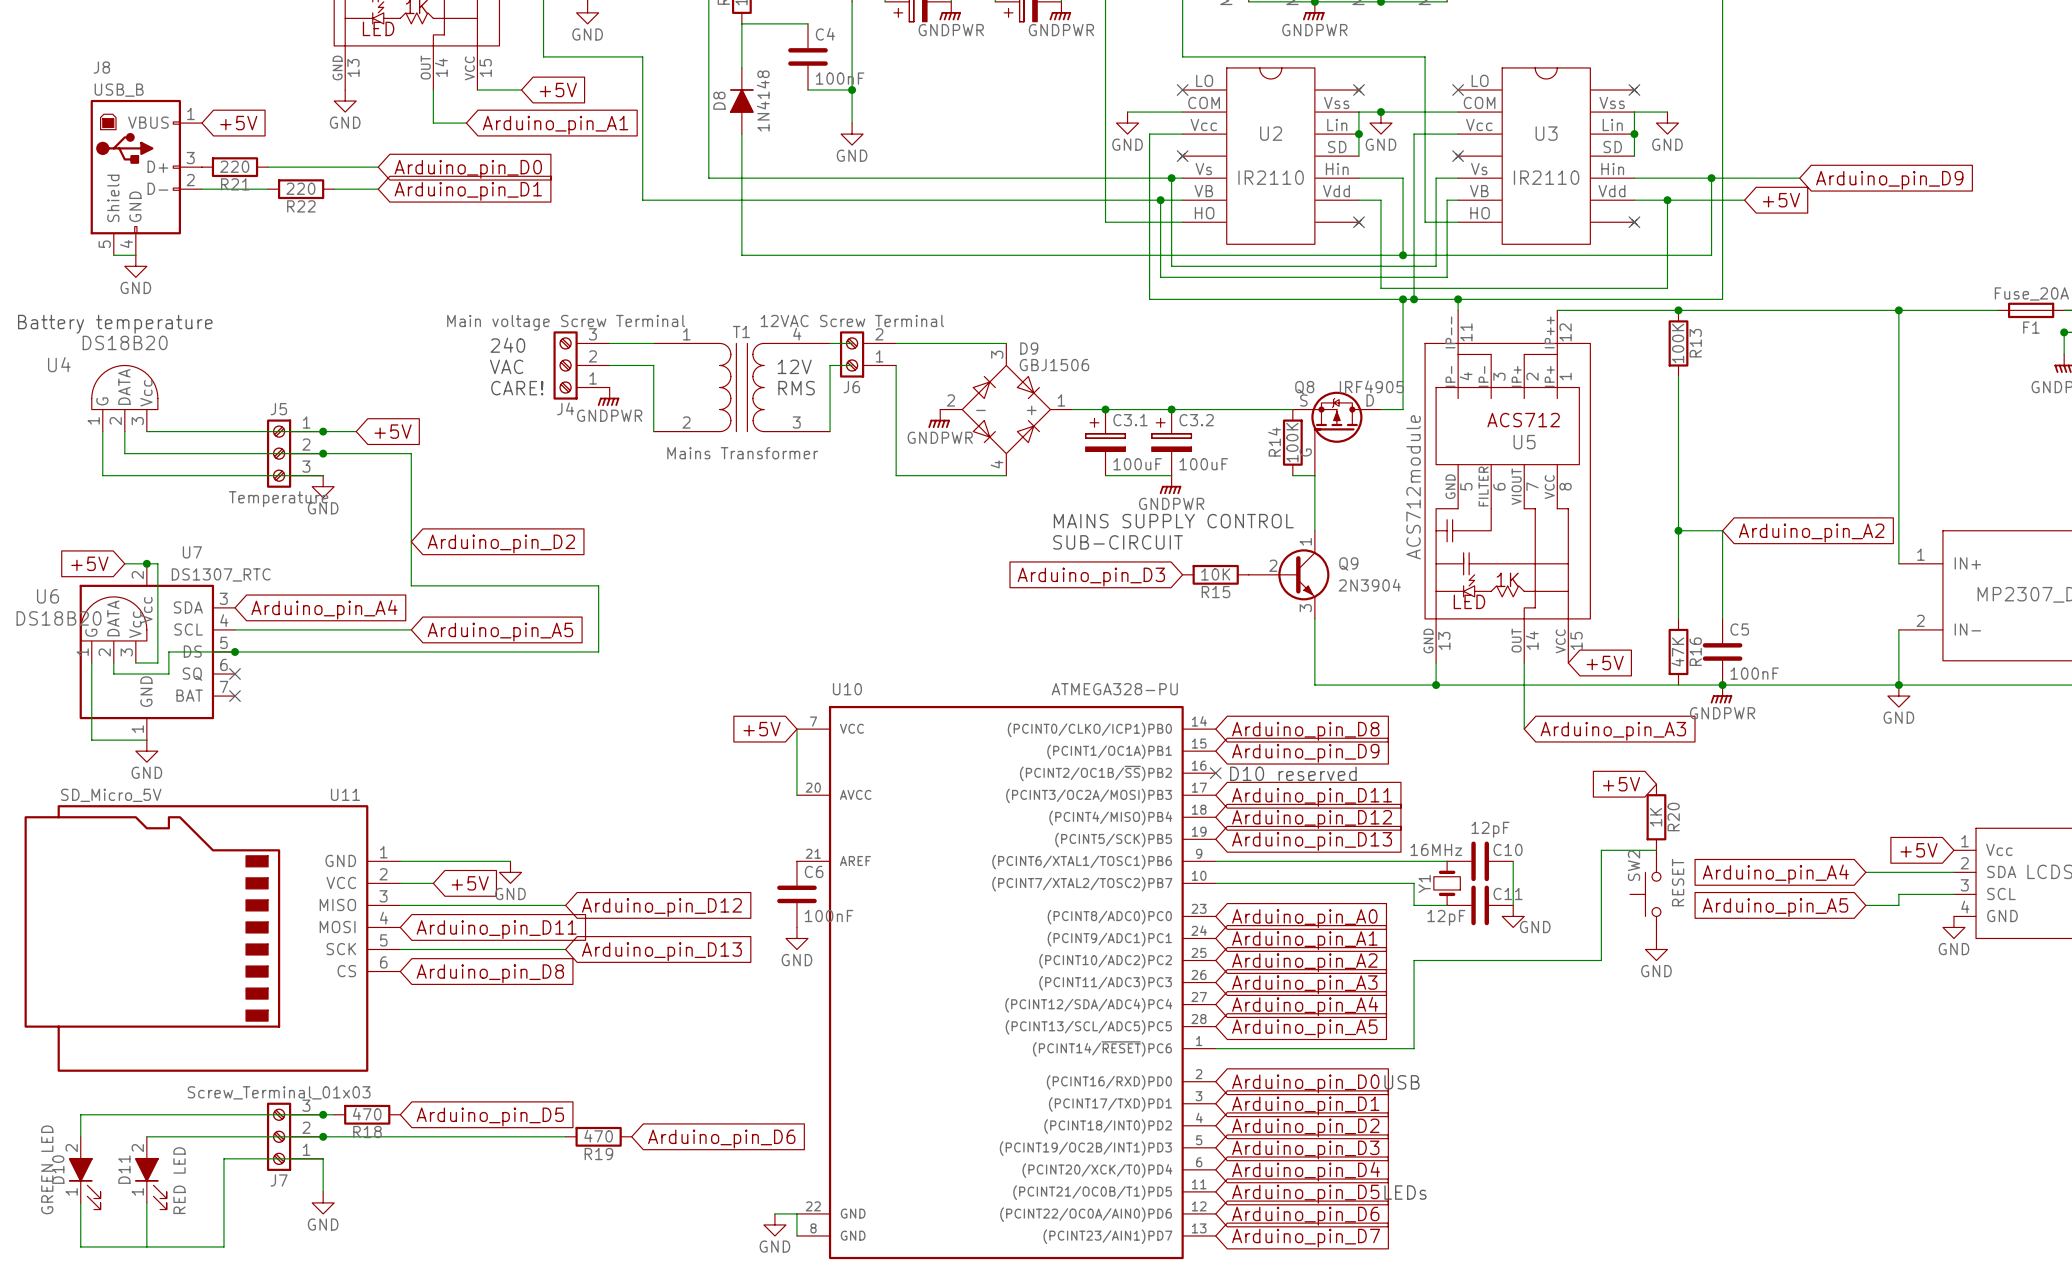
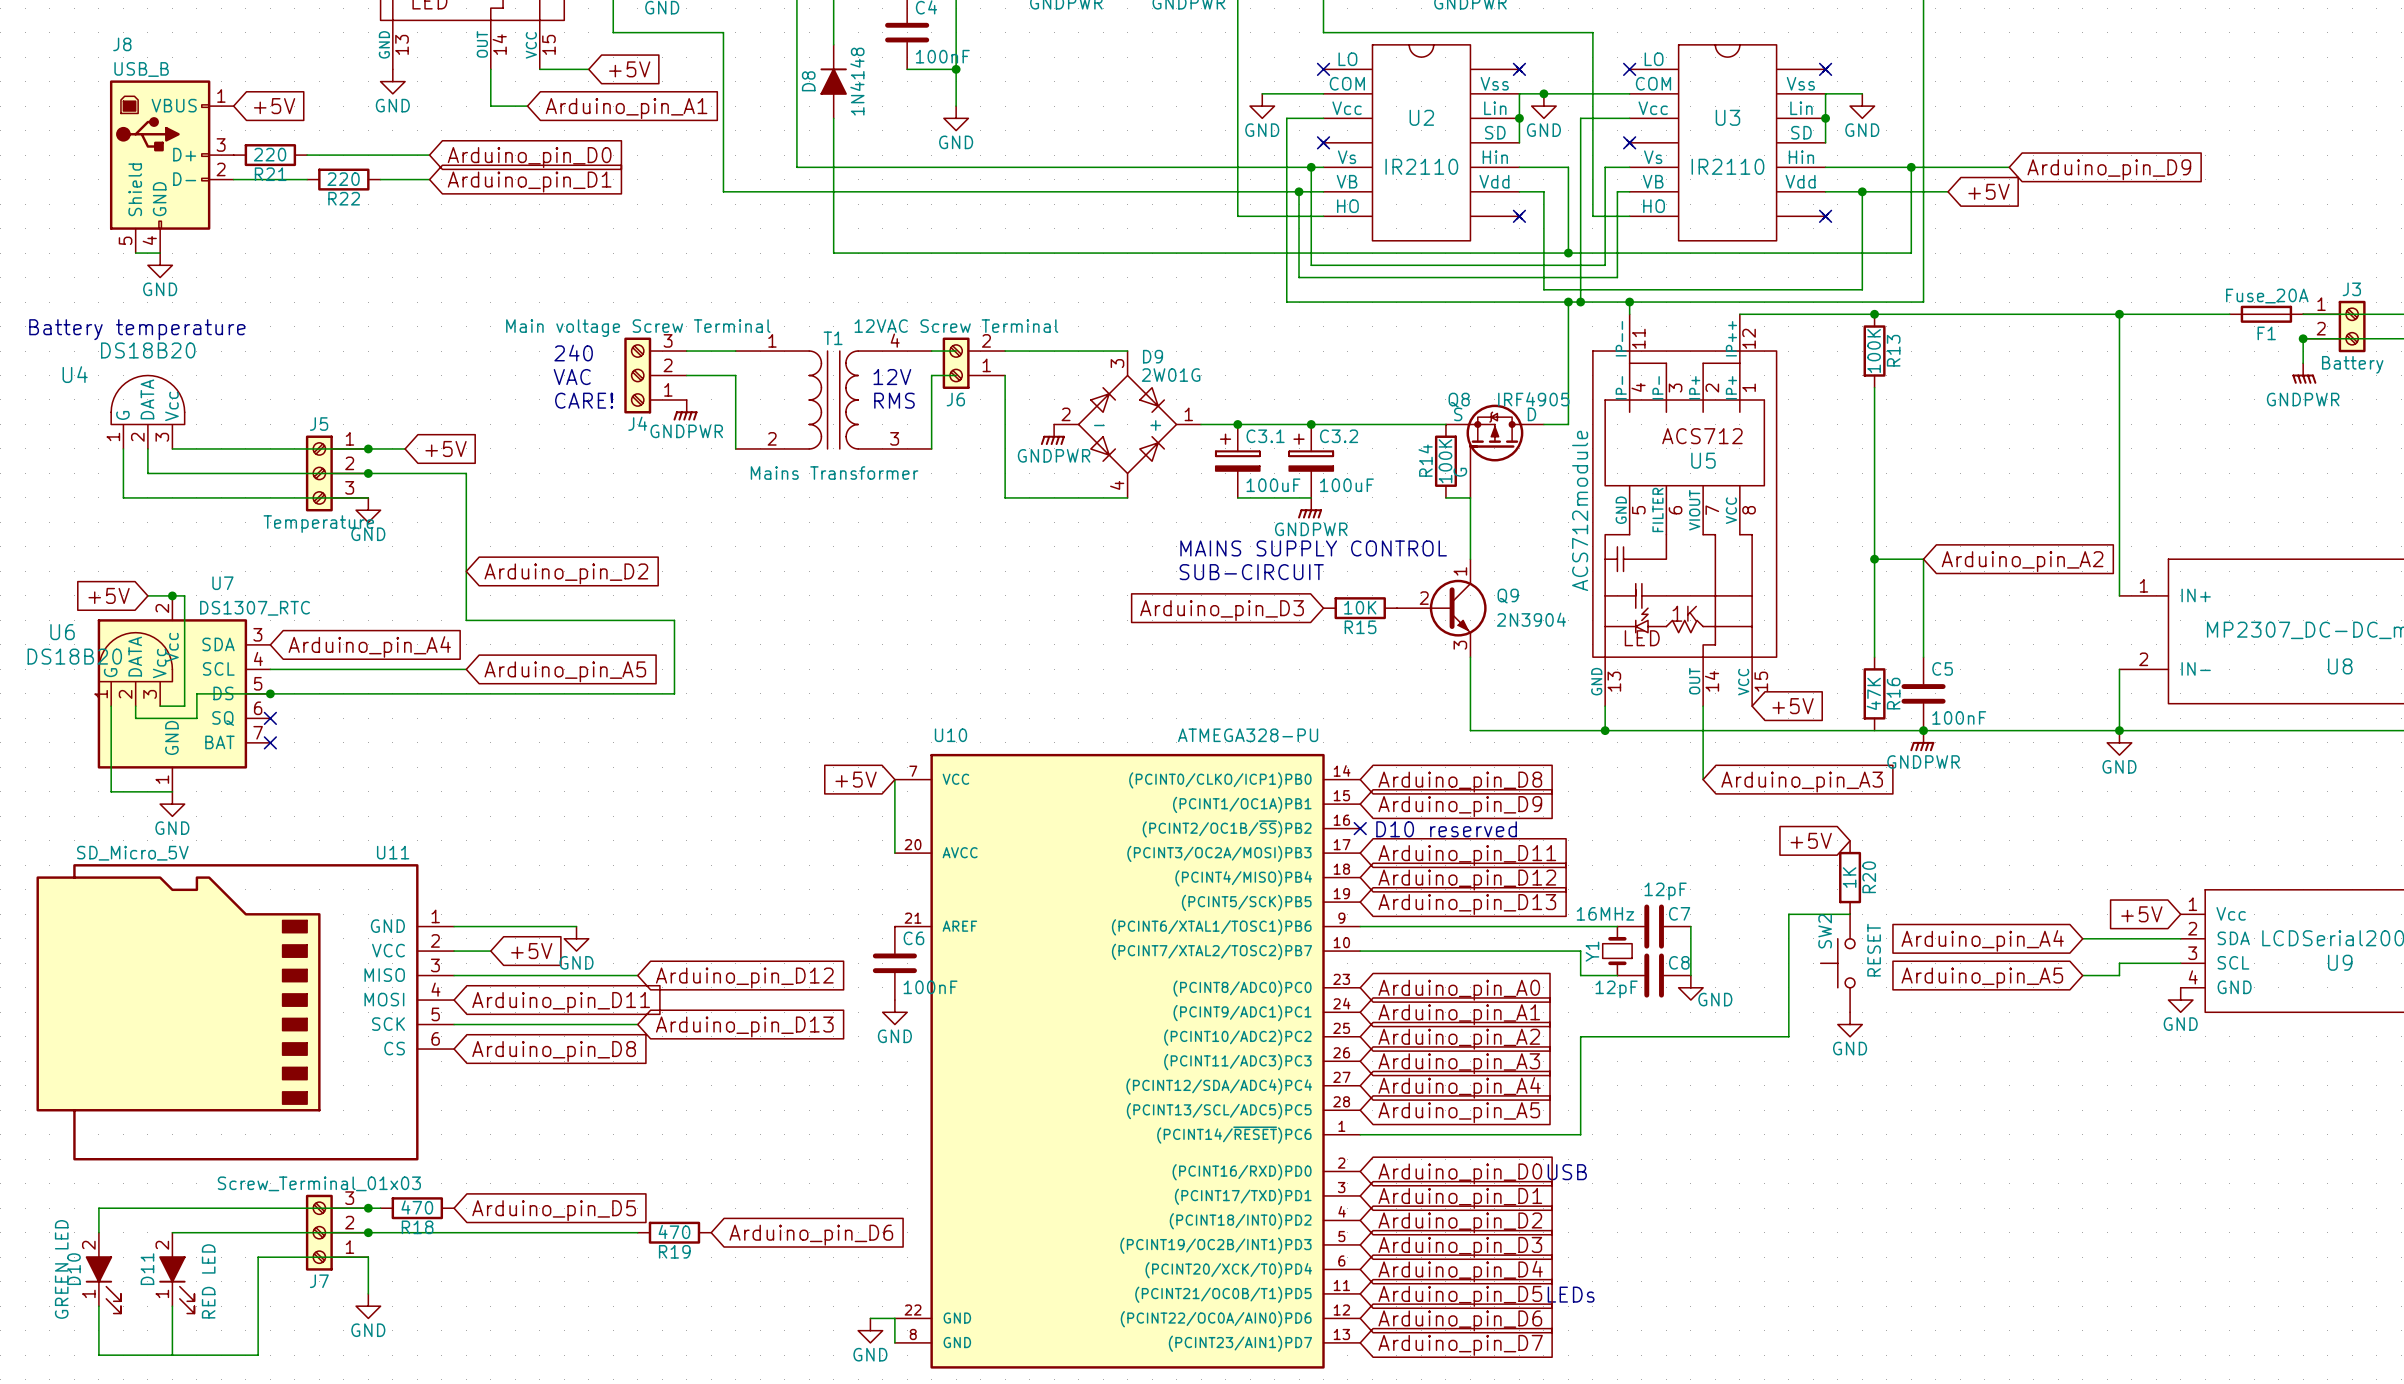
D9 value: GBJ1506 (1054, 365) -> 2W01G (1171, 375)
C10 name: C10 (1508, 849) -> C7 (1679, 913)
C11 name: C11 (1508, 893) -> C8 (1679, 962)

